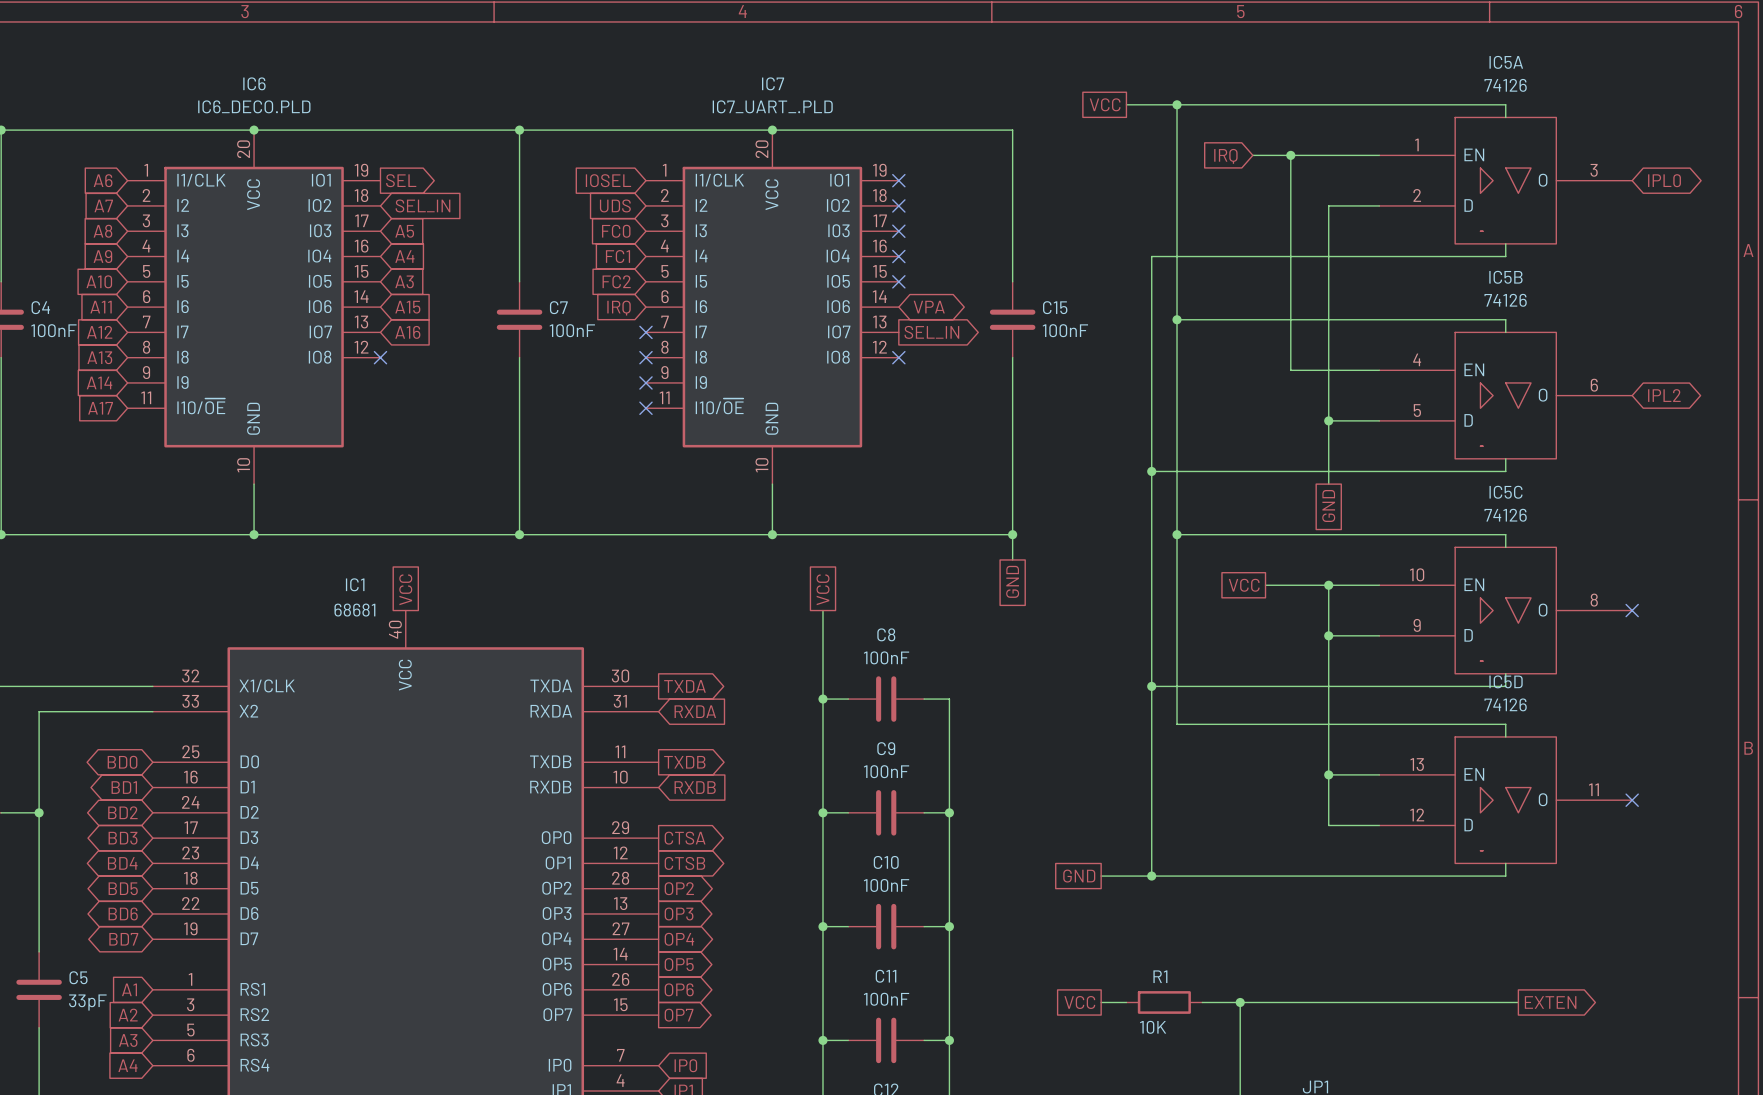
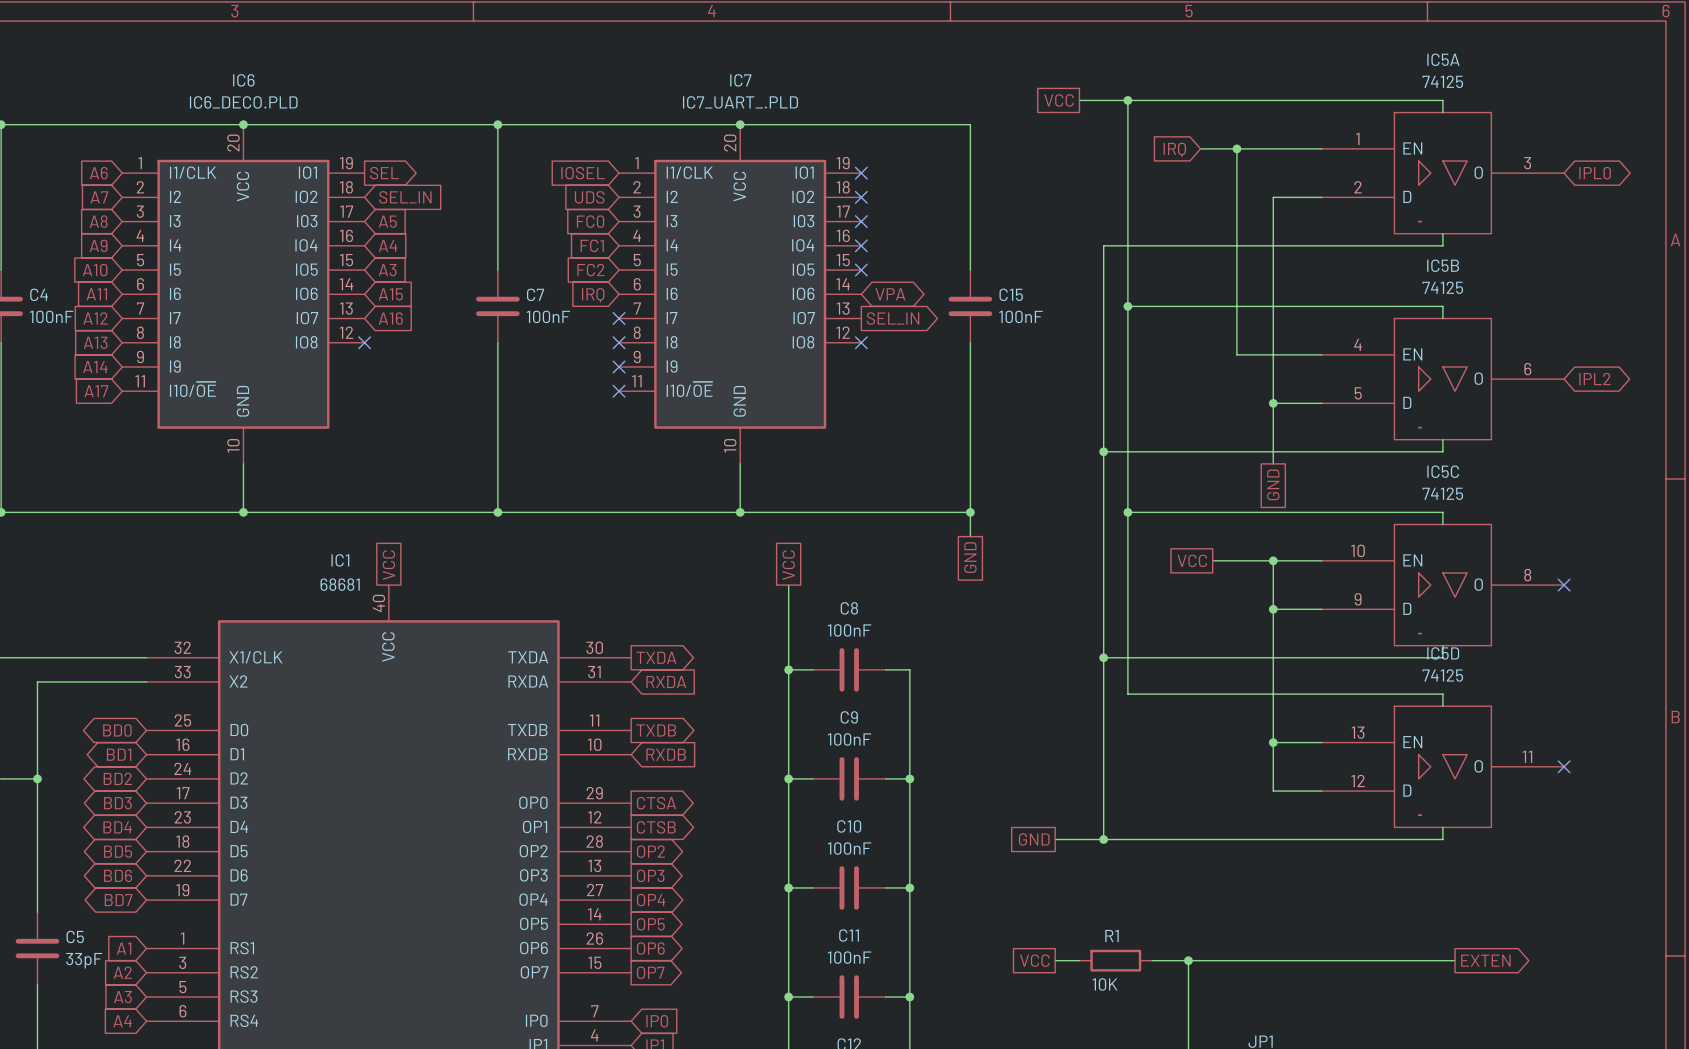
IC5A value: 74126 (1505, 85) -> 74125 (1442, 81)
IC5B value: 74126 (1505, 300) -> 74125 (1442, 287)
IC5C value: 74126 (1505, 515) -> 74125 (1442, 493)
IC5D value: 74126 (1505, 704) -> 74125 (1442, 675)

